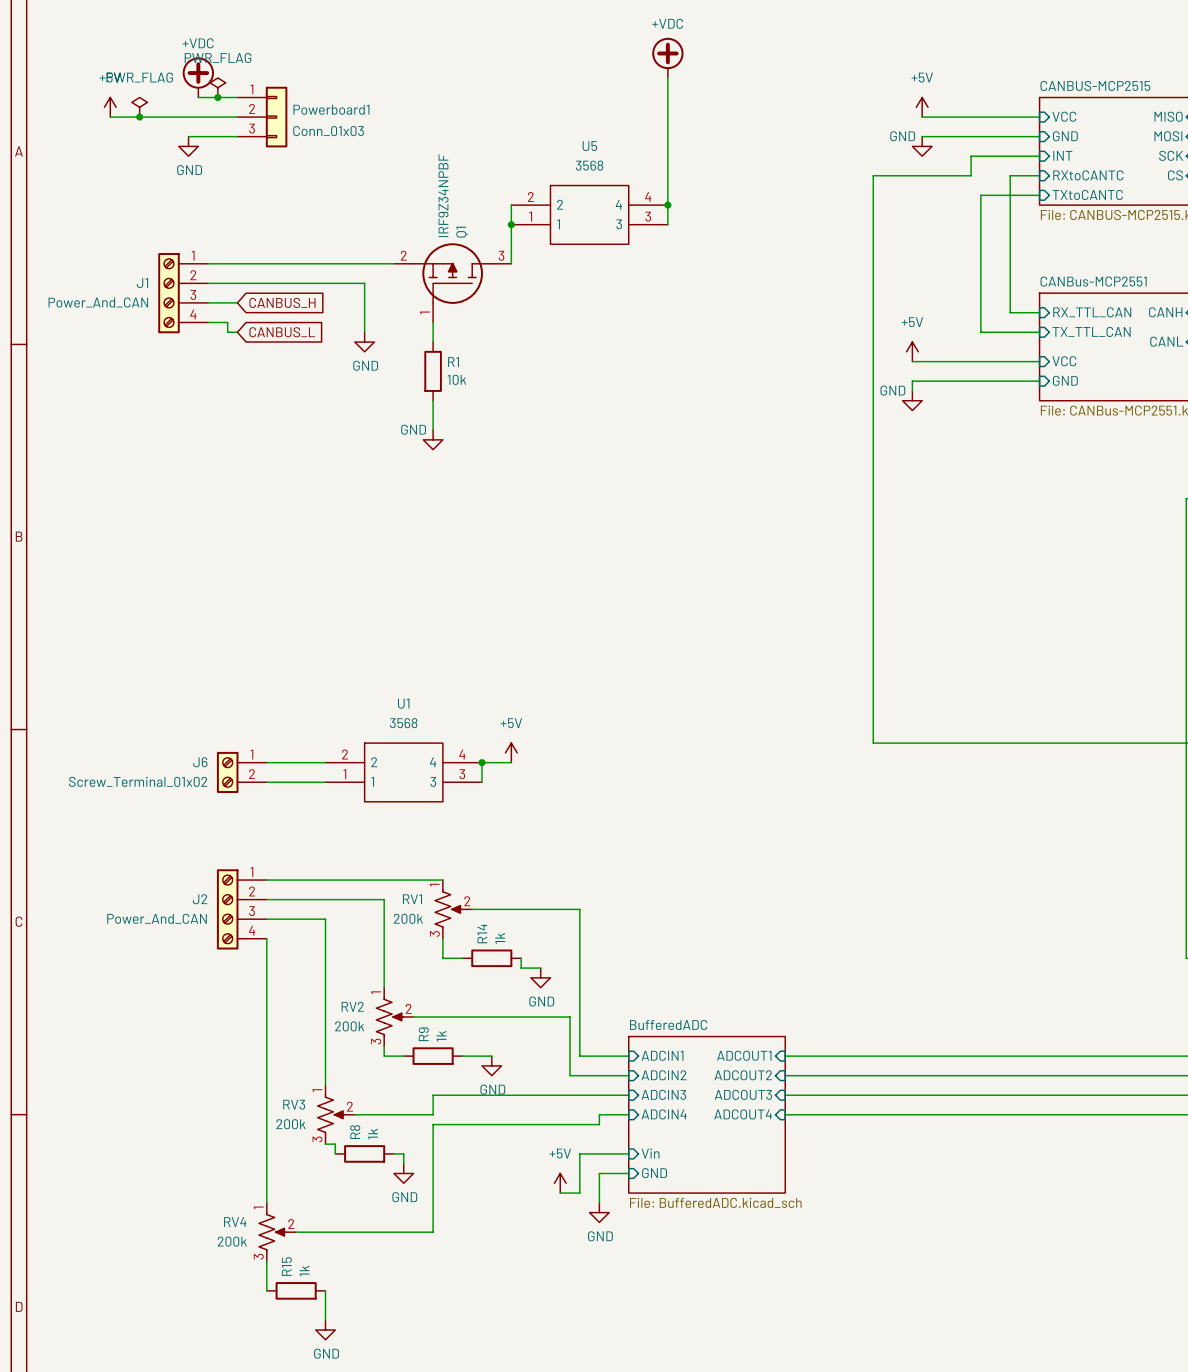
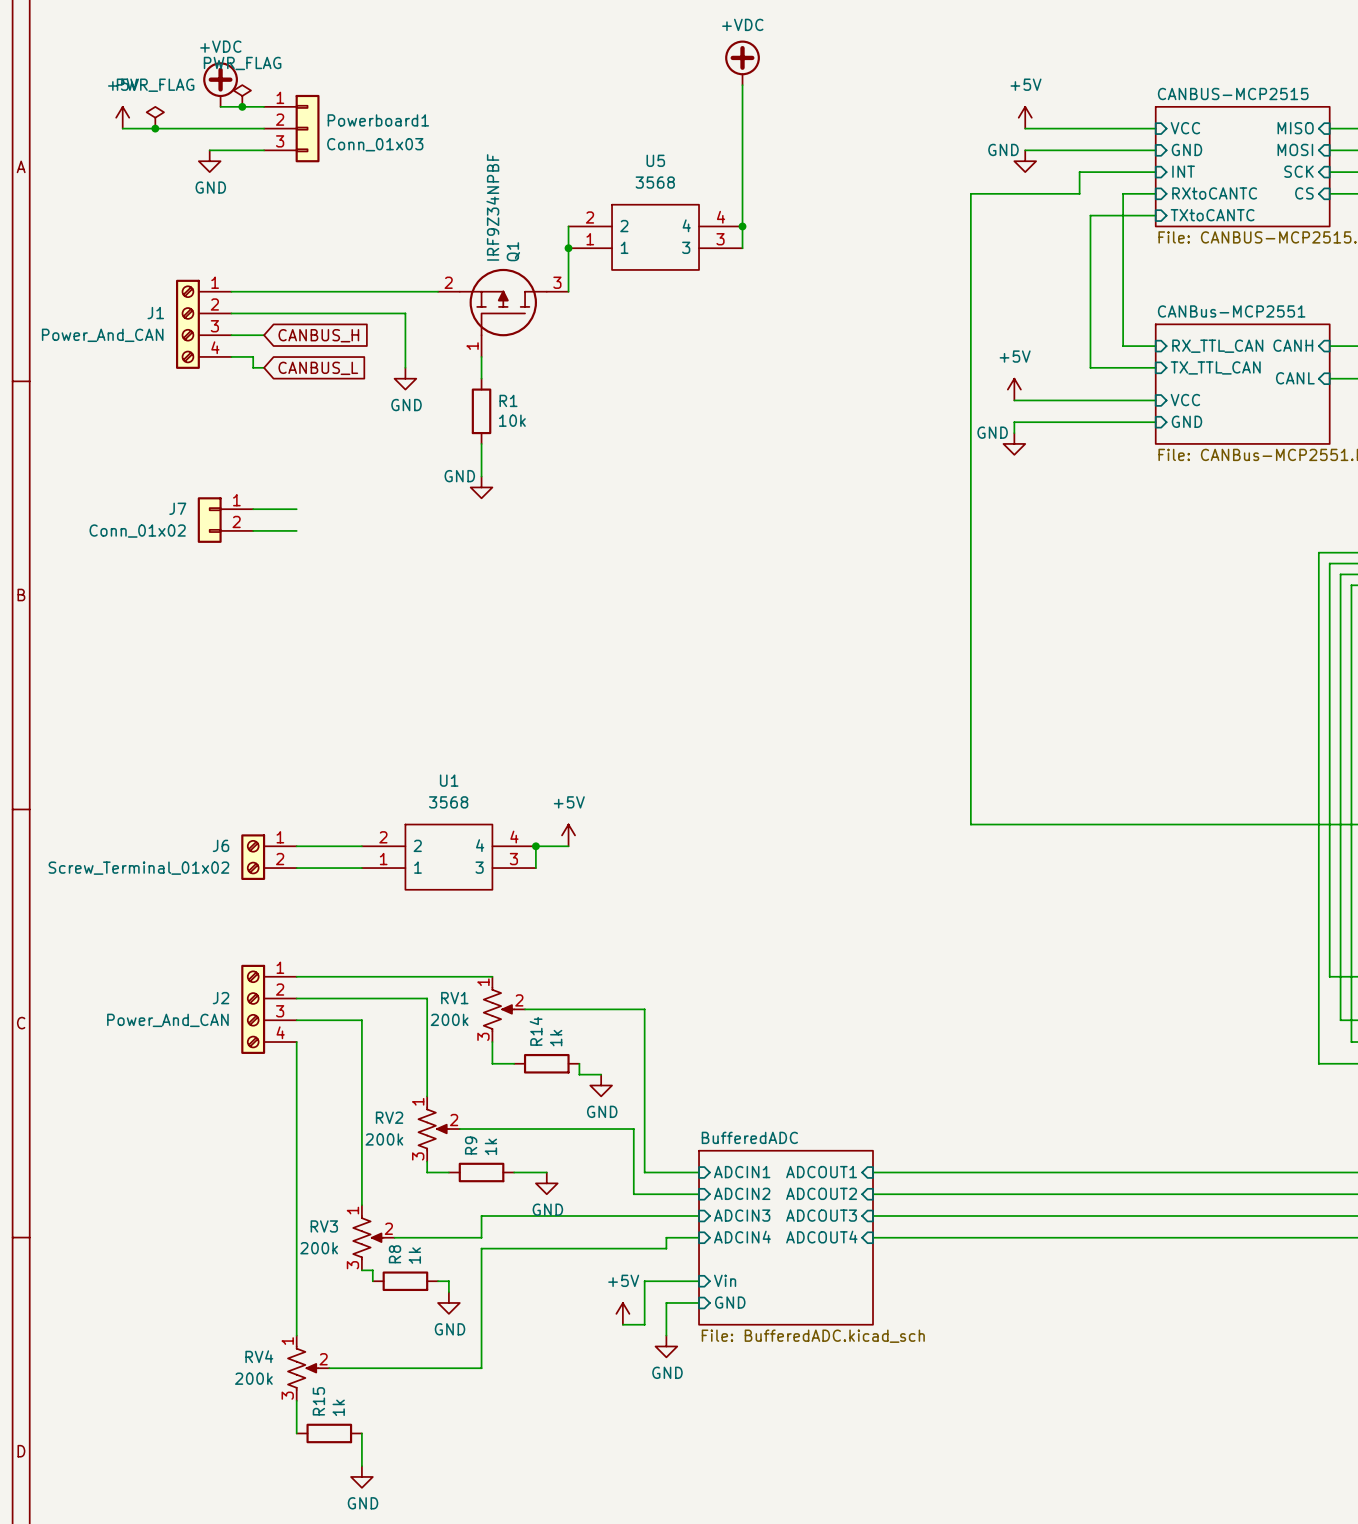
wire: none -> (253, 509) (296, 509)
J7: none -> Conn_01x02 (225, 520)
wire: none -> (253, 530) (296, 530)

